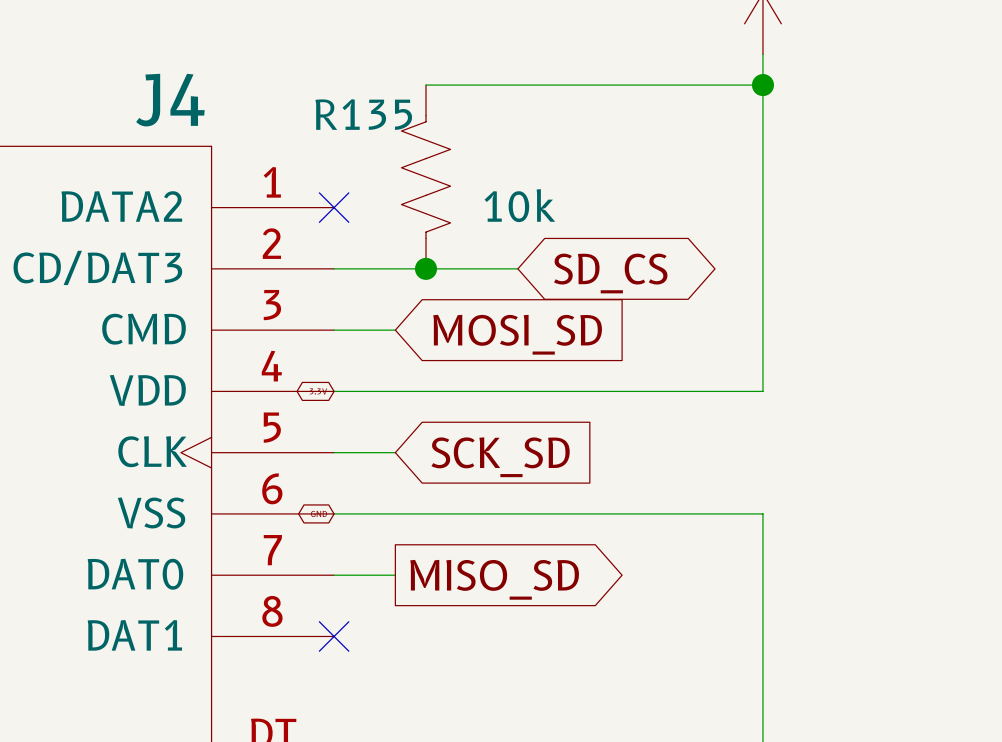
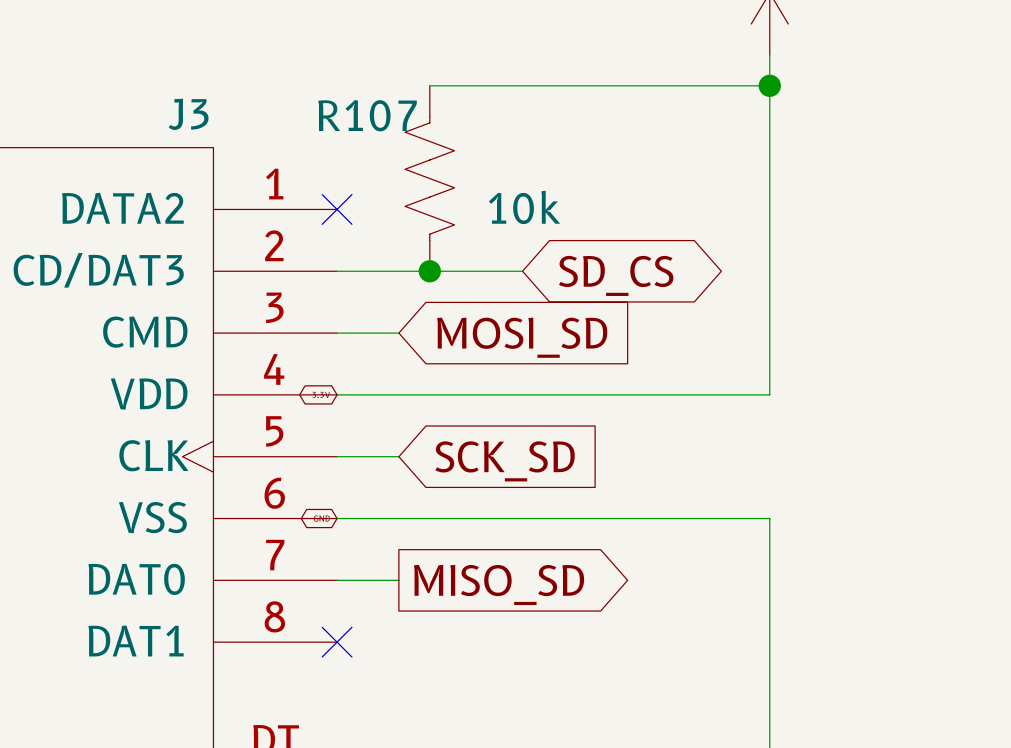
J4 name: J4 (170, 100) -> J3 (188, 114)
R135 name: R135 (363, 114) -> R107 (367, 115)

